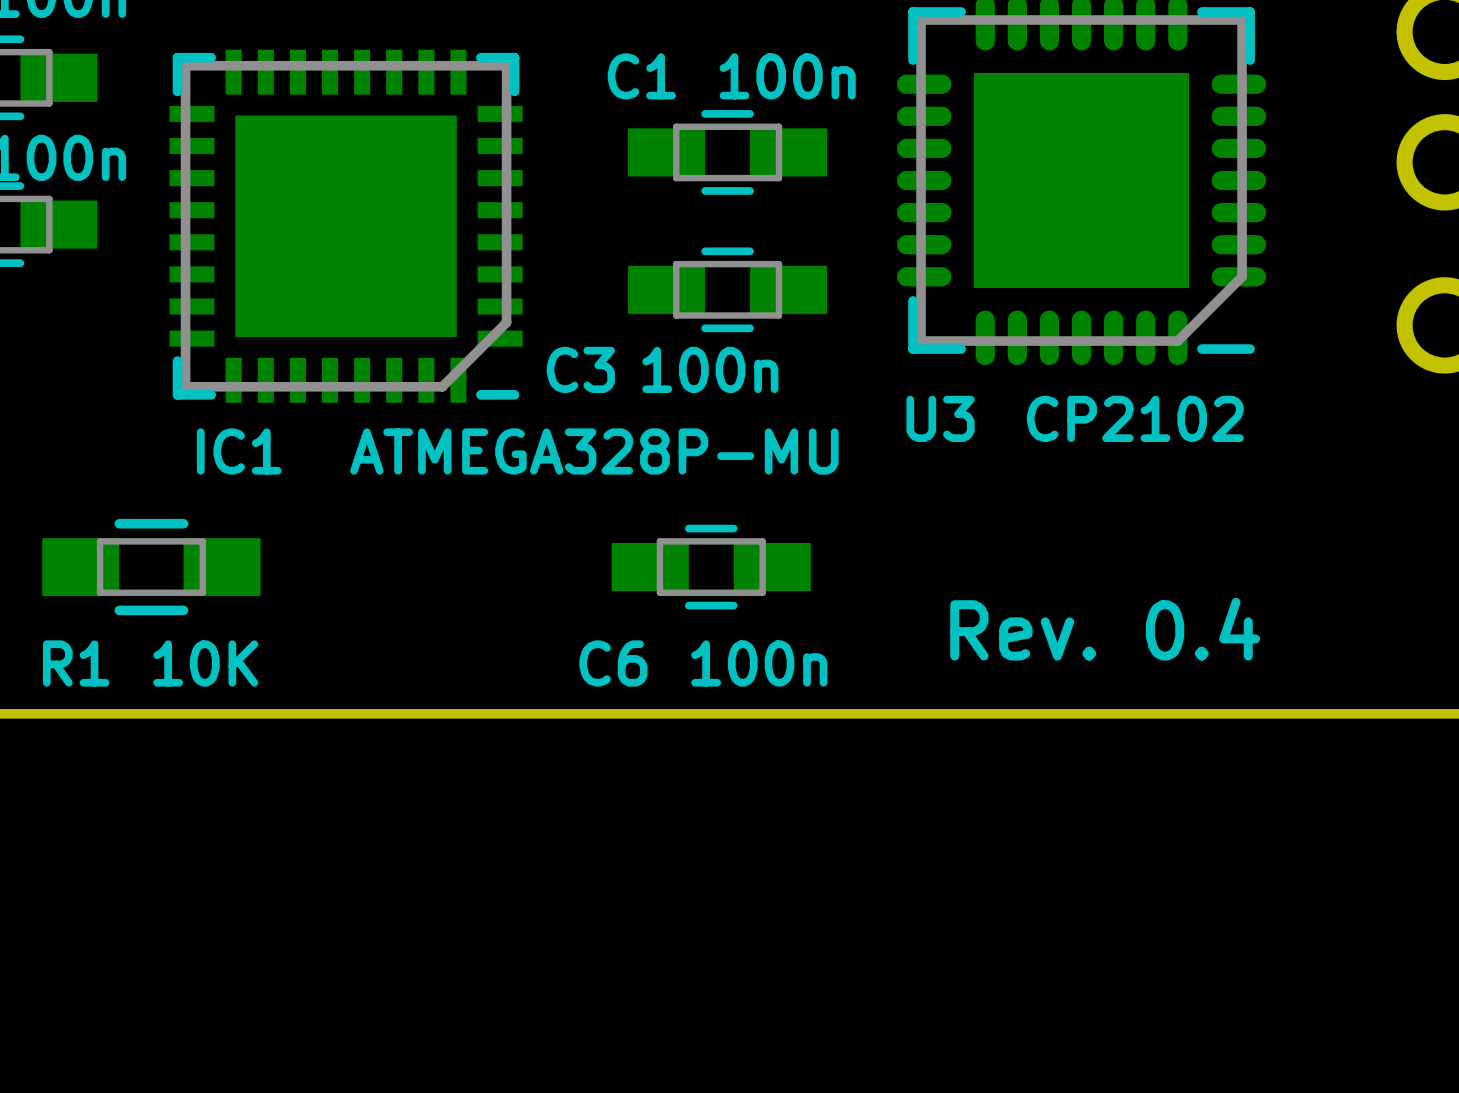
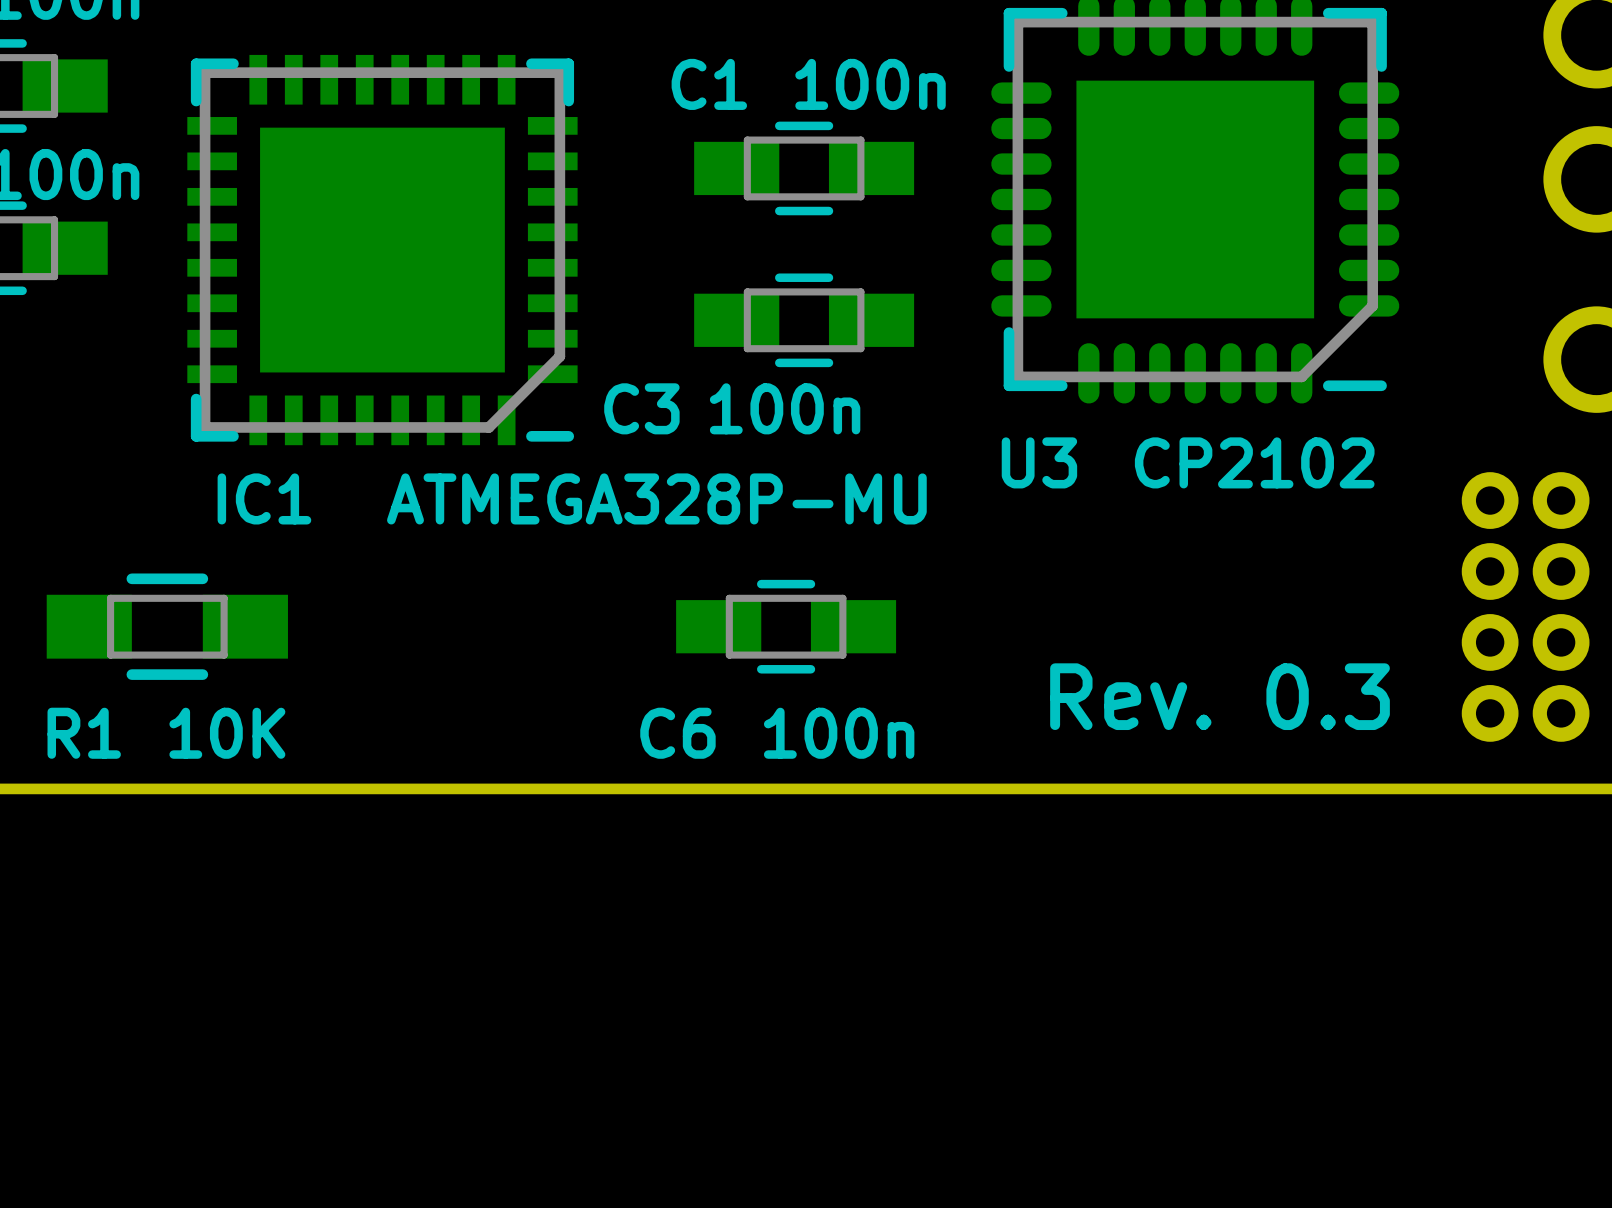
part: none -> (1490, 500)
part: none -> (1561, 500)
part: none -> (1490, 571)
part: none -> (1561, 571)
part: none -> (1490, 642)
part: none -> (1561, 642)
text: Rev. 0.4 (1105, 629) -> Rev. 0.3 (1220, 696)
part: none -> (1490, 713)
part: none -> (1561, 713)

